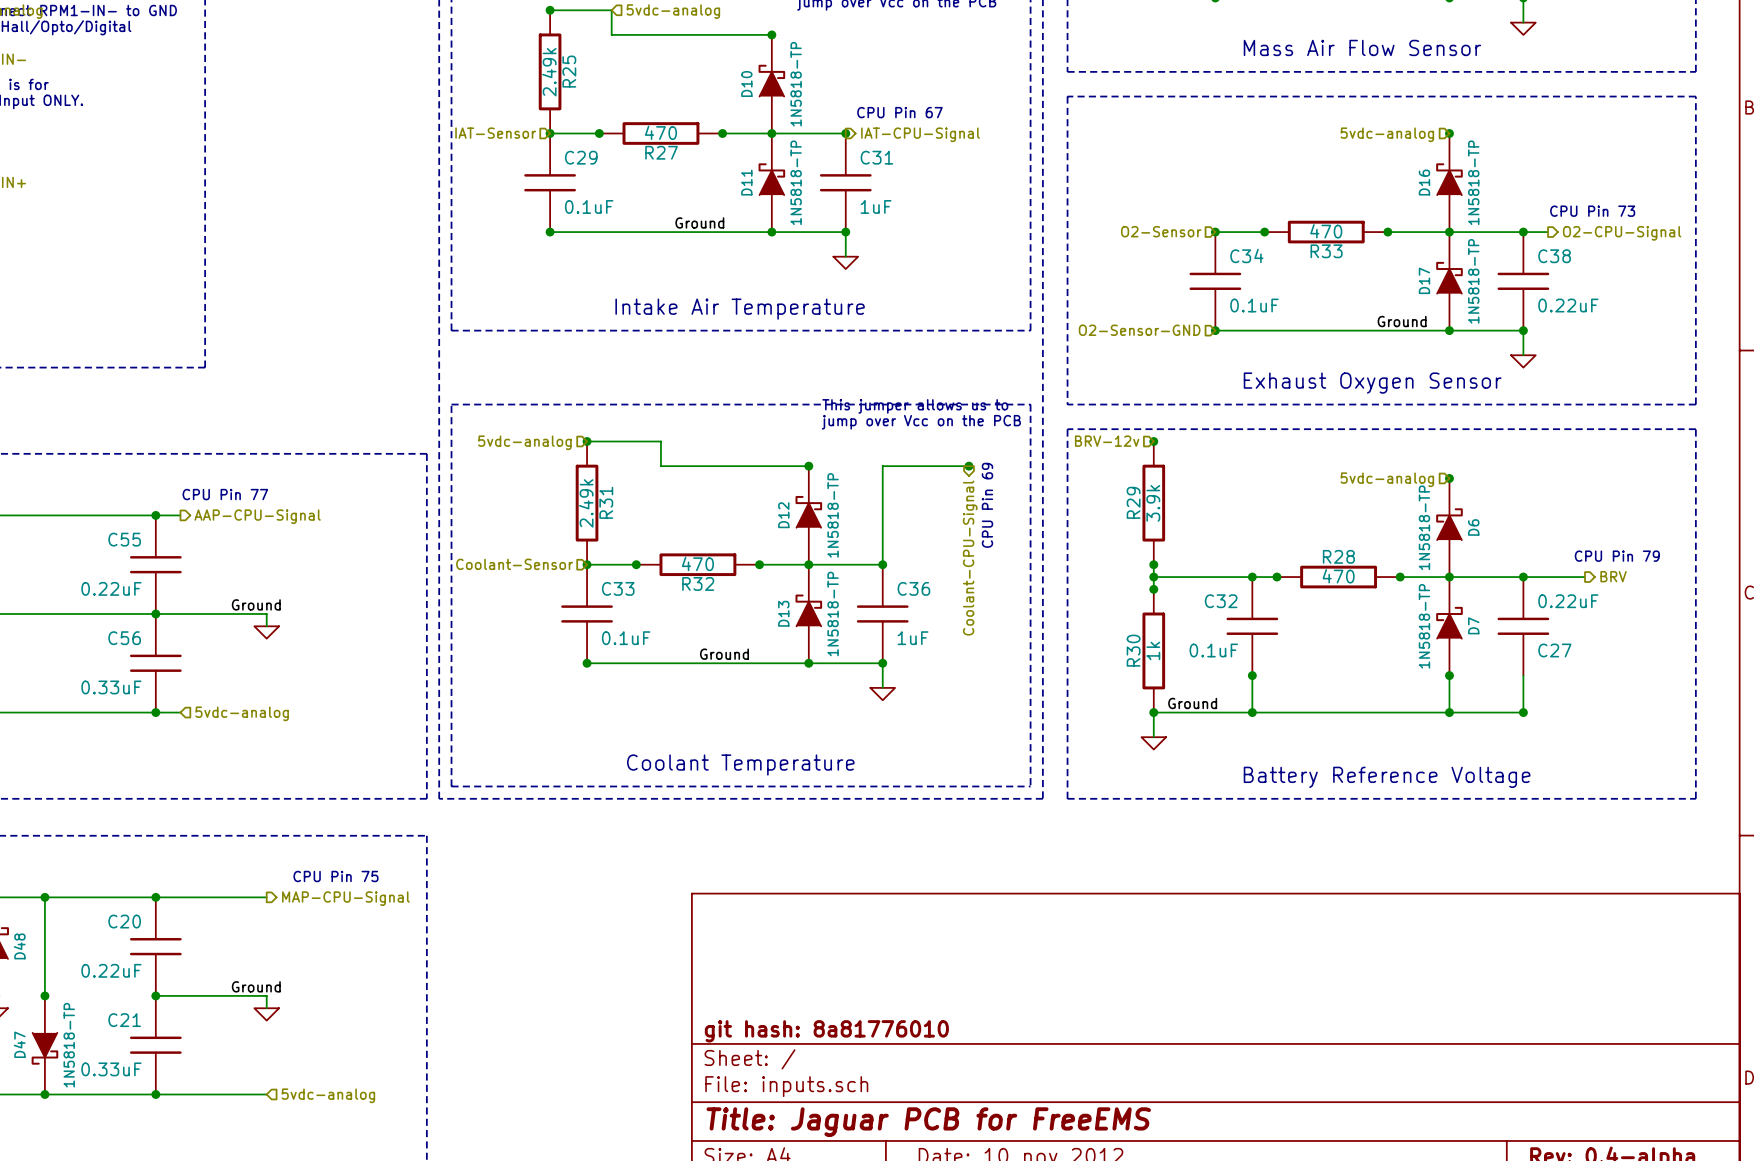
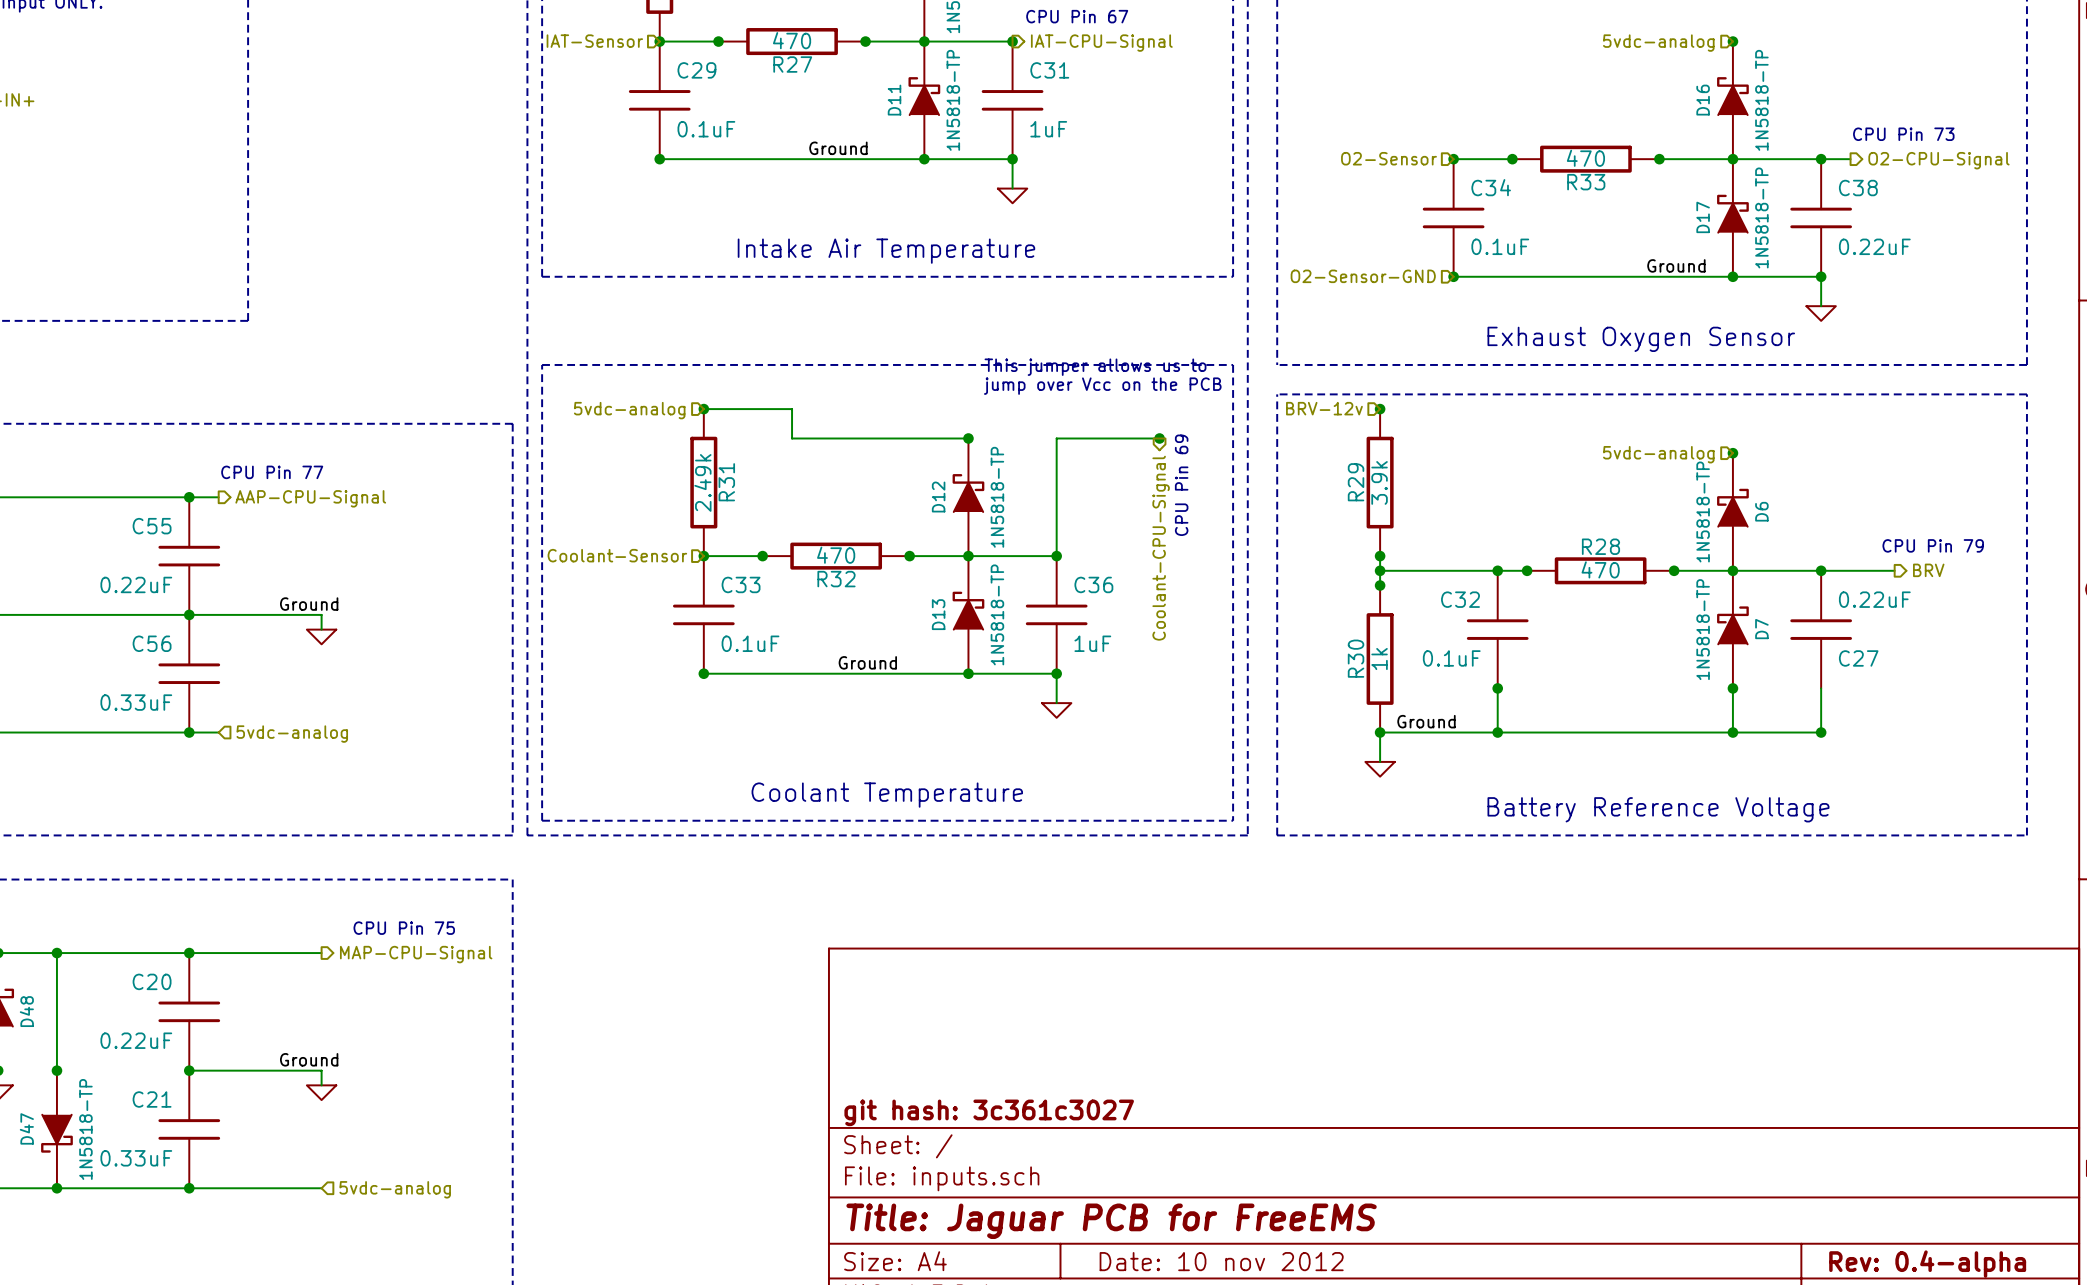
title block: git hash: 8a81776010 (826, 1031) -> git hash: 3c361c3027 (989, 1112)

